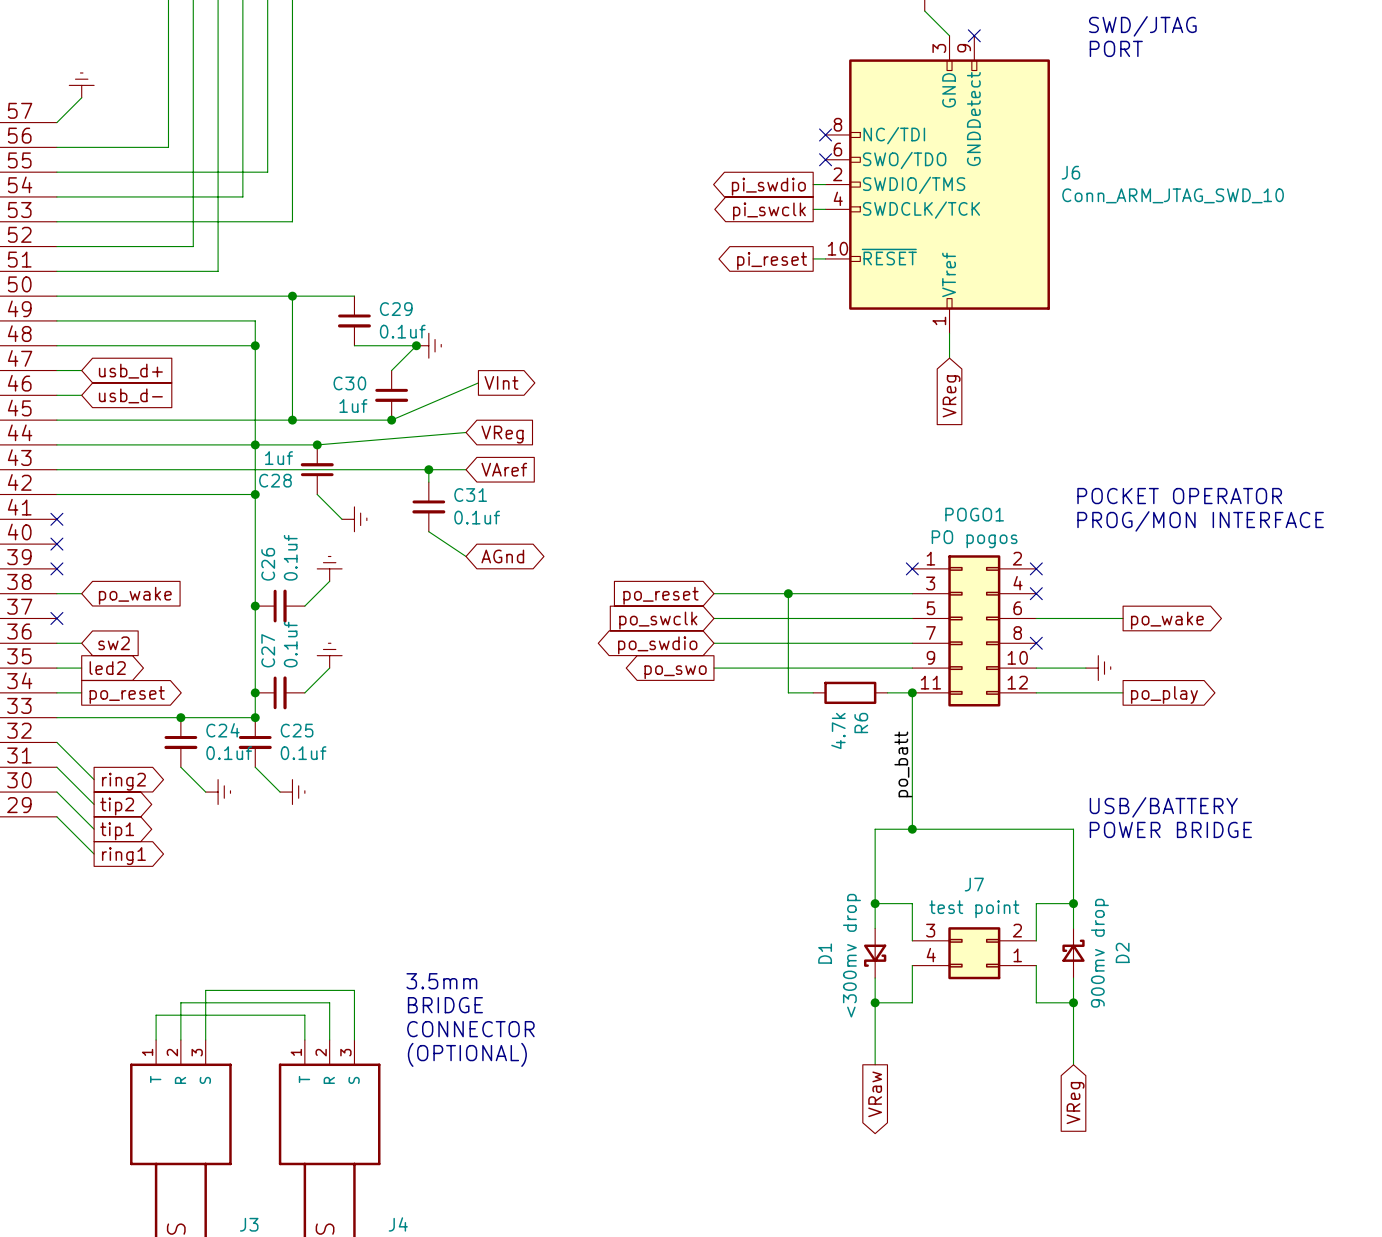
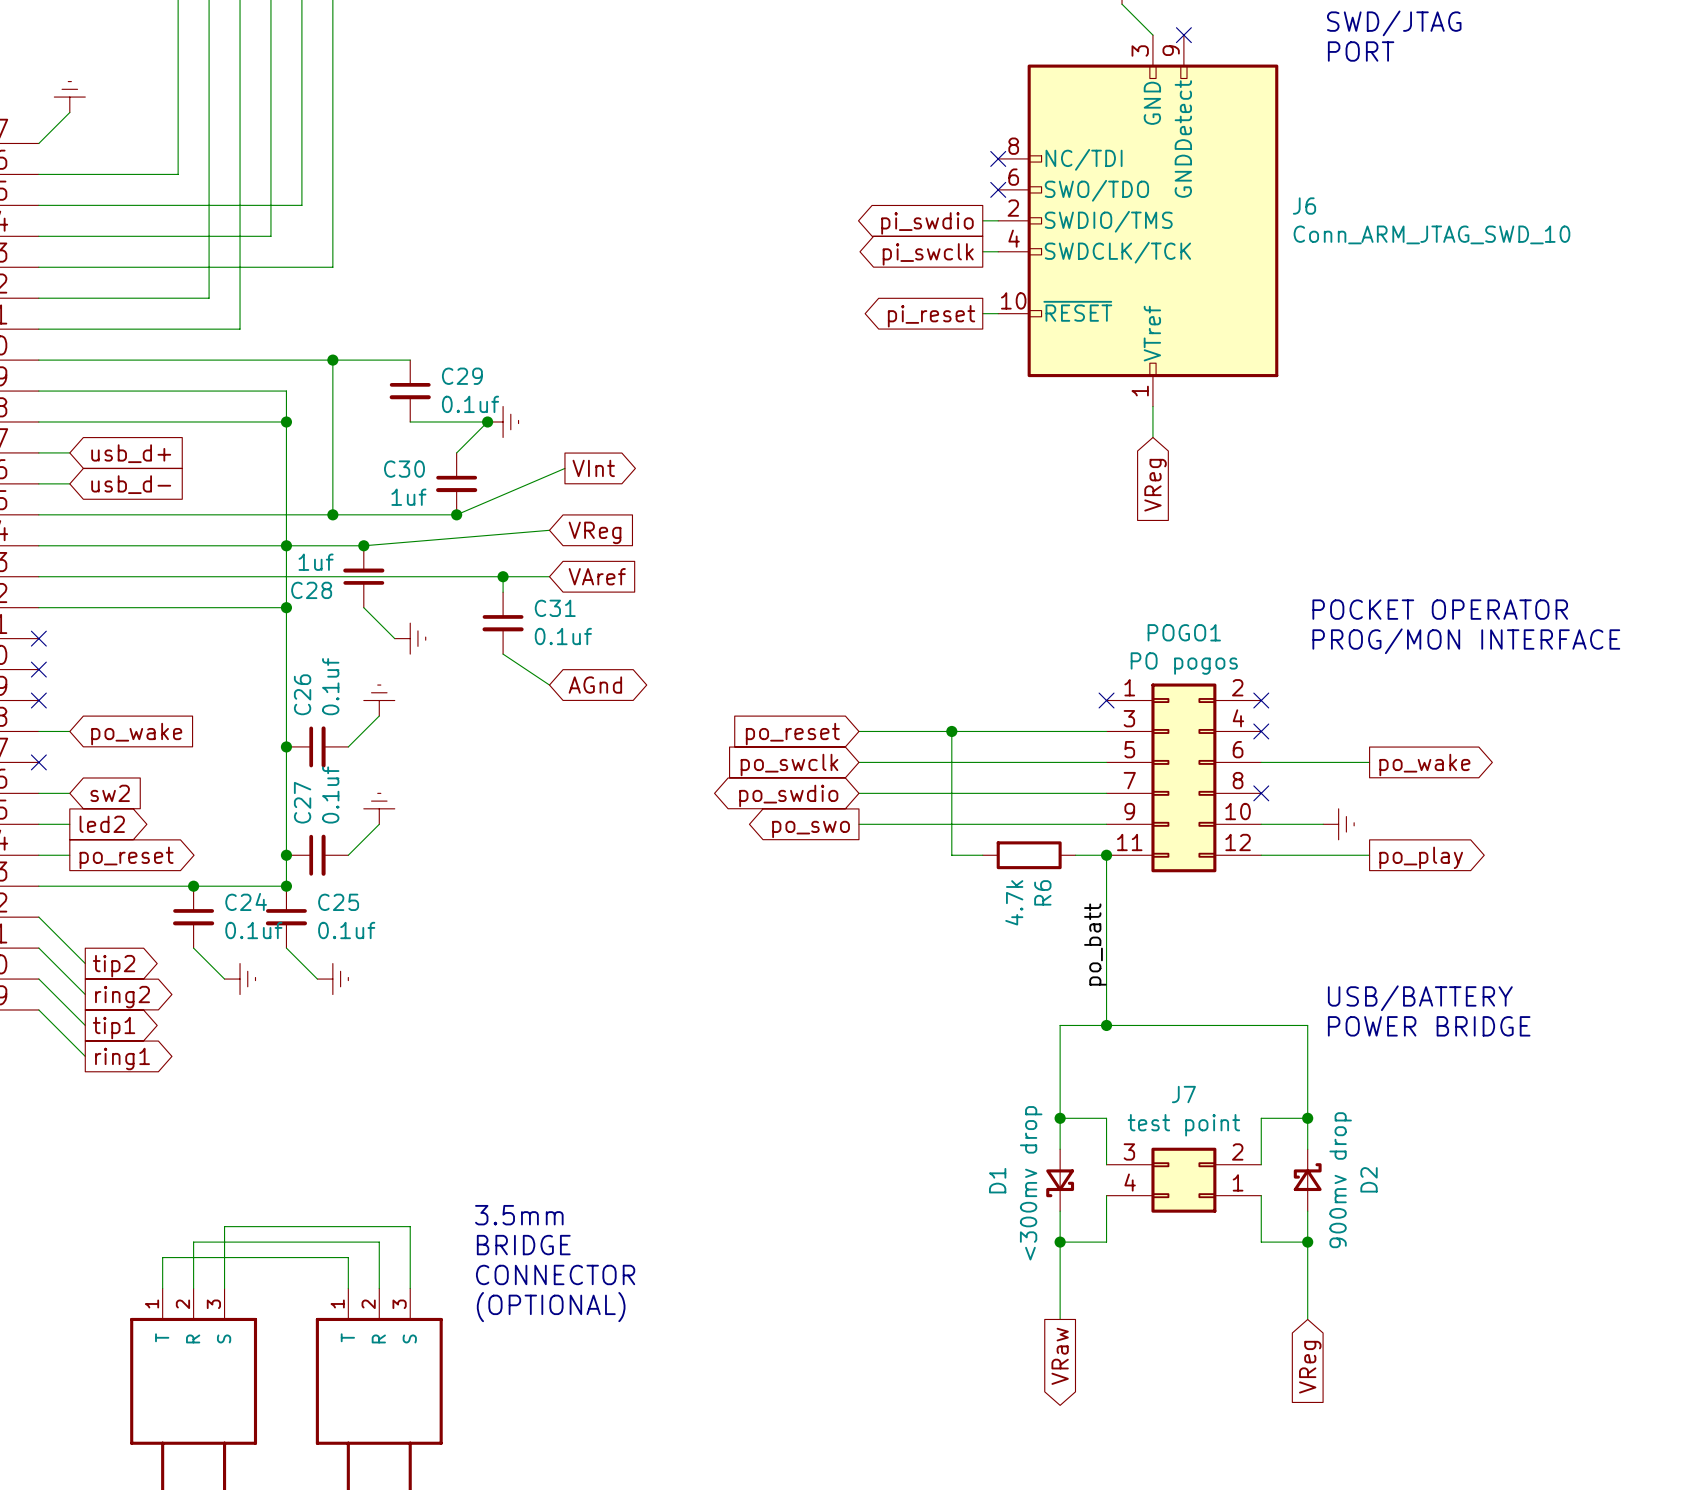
global label: ring2 (123, 781) -> tip2 (114, 966)
global label: tip2 (117, 806) -> ring2 (122, 997)

